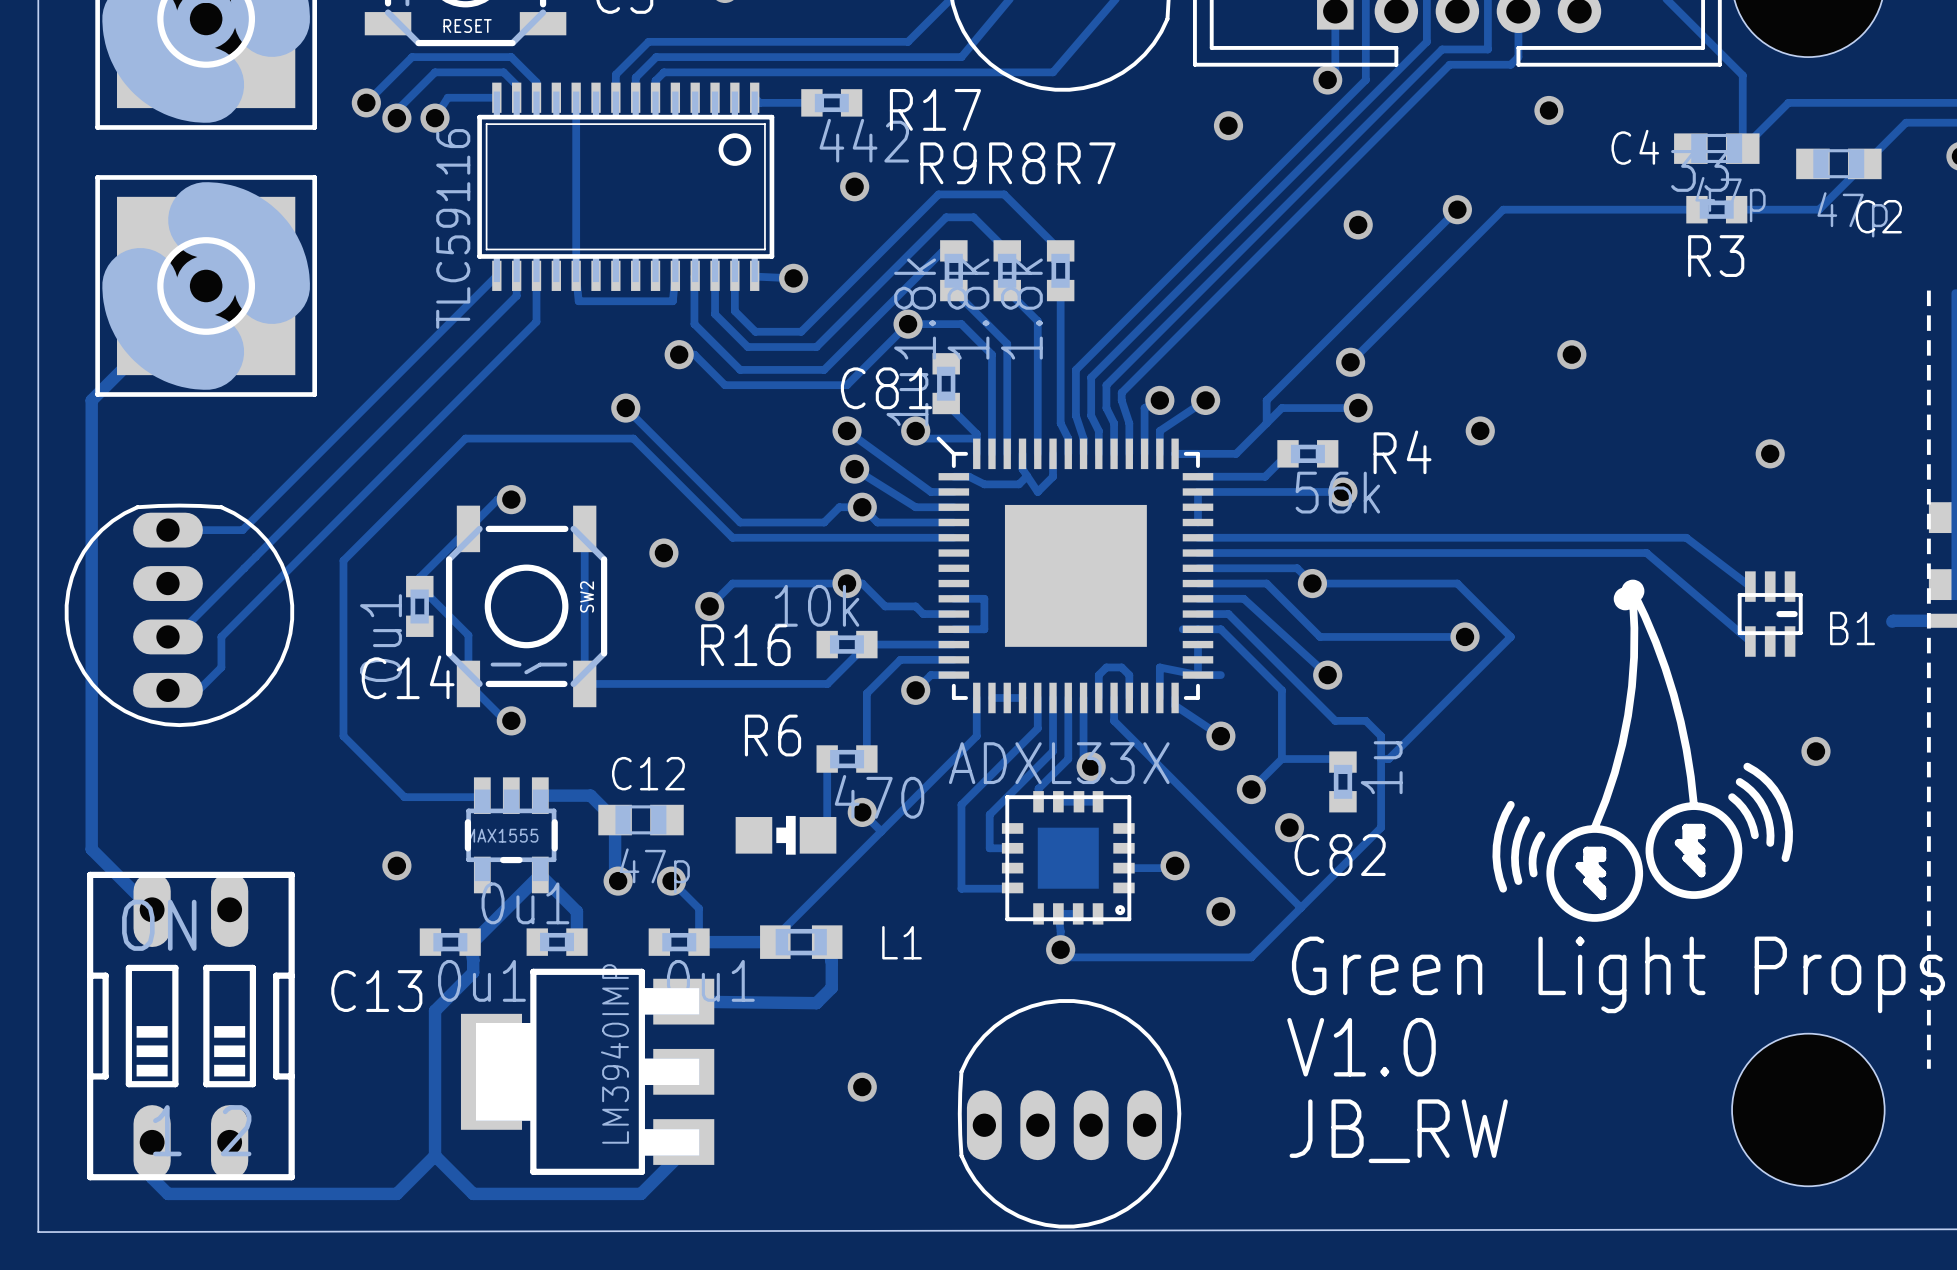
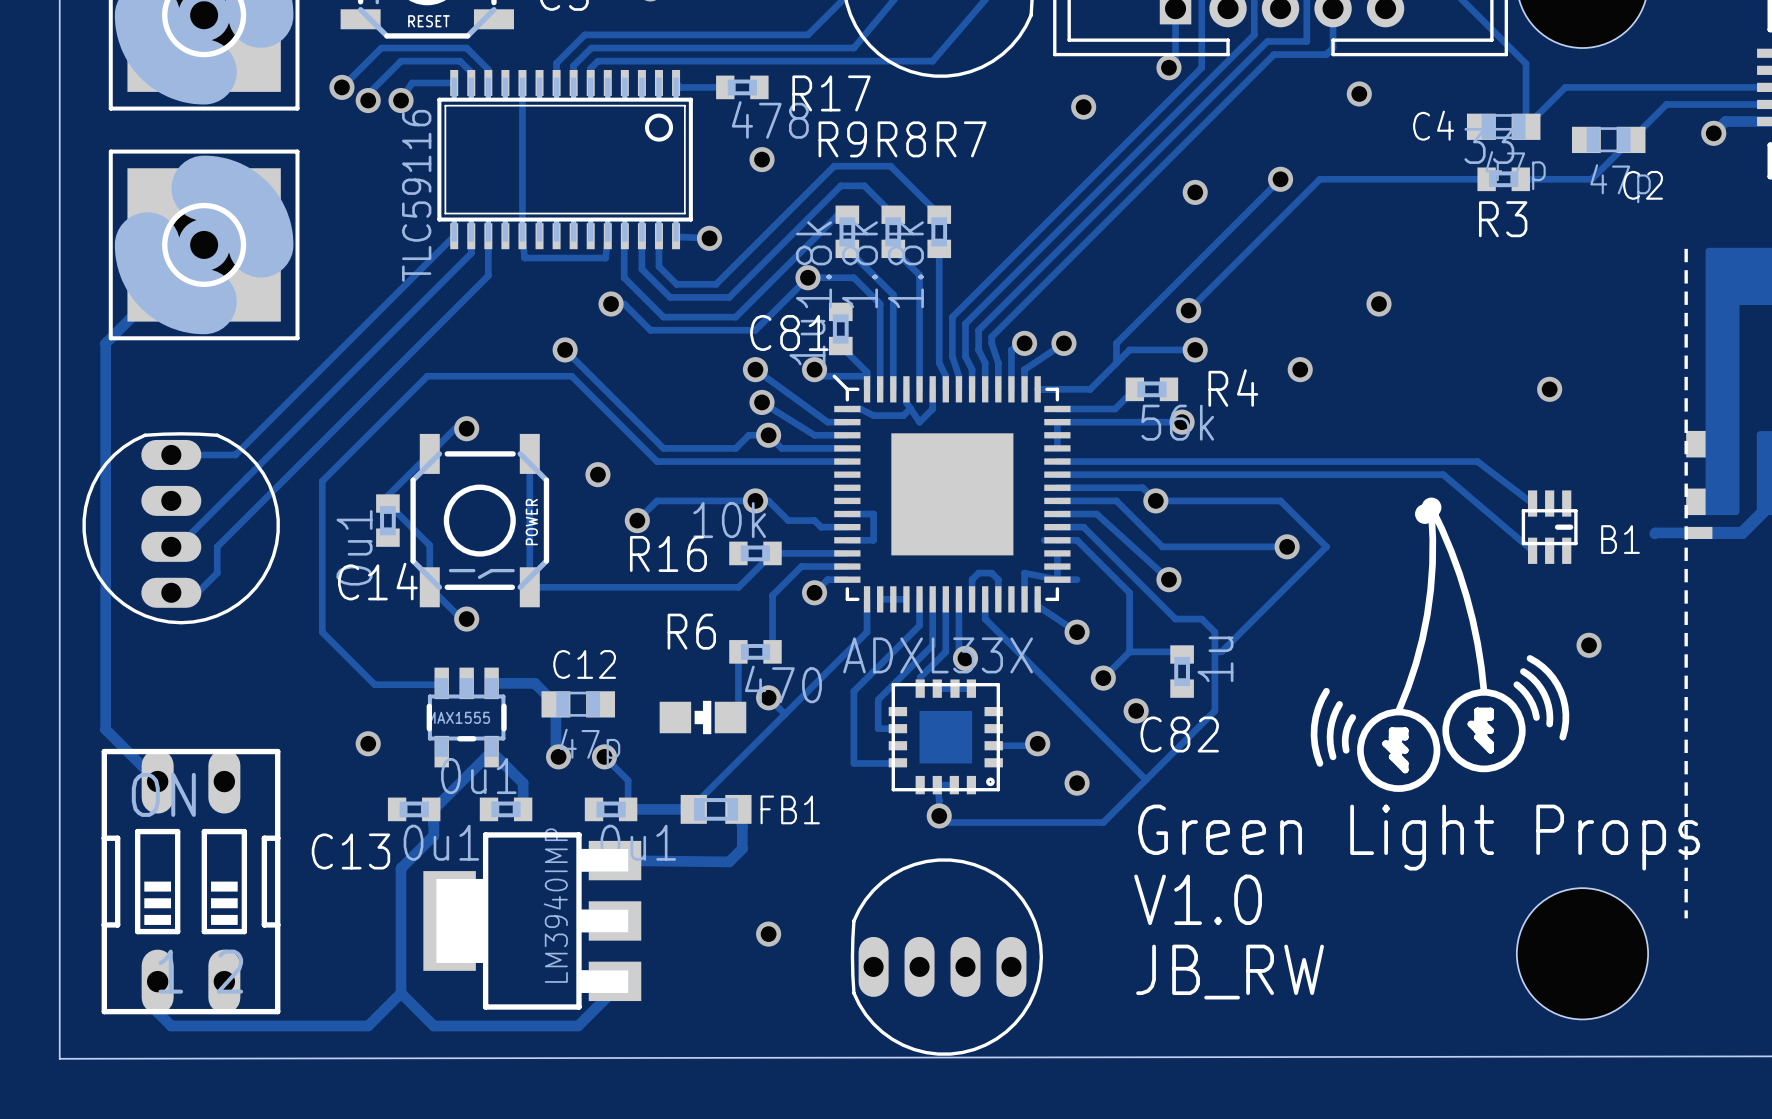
R17 value: 442 (864, 140) -> 478 (770, 119)
SW2 name: SW2 (587, 596) -> POWER (531, 522)
L1 name: L1 (902, 942) -> FB1 (790, 809)

